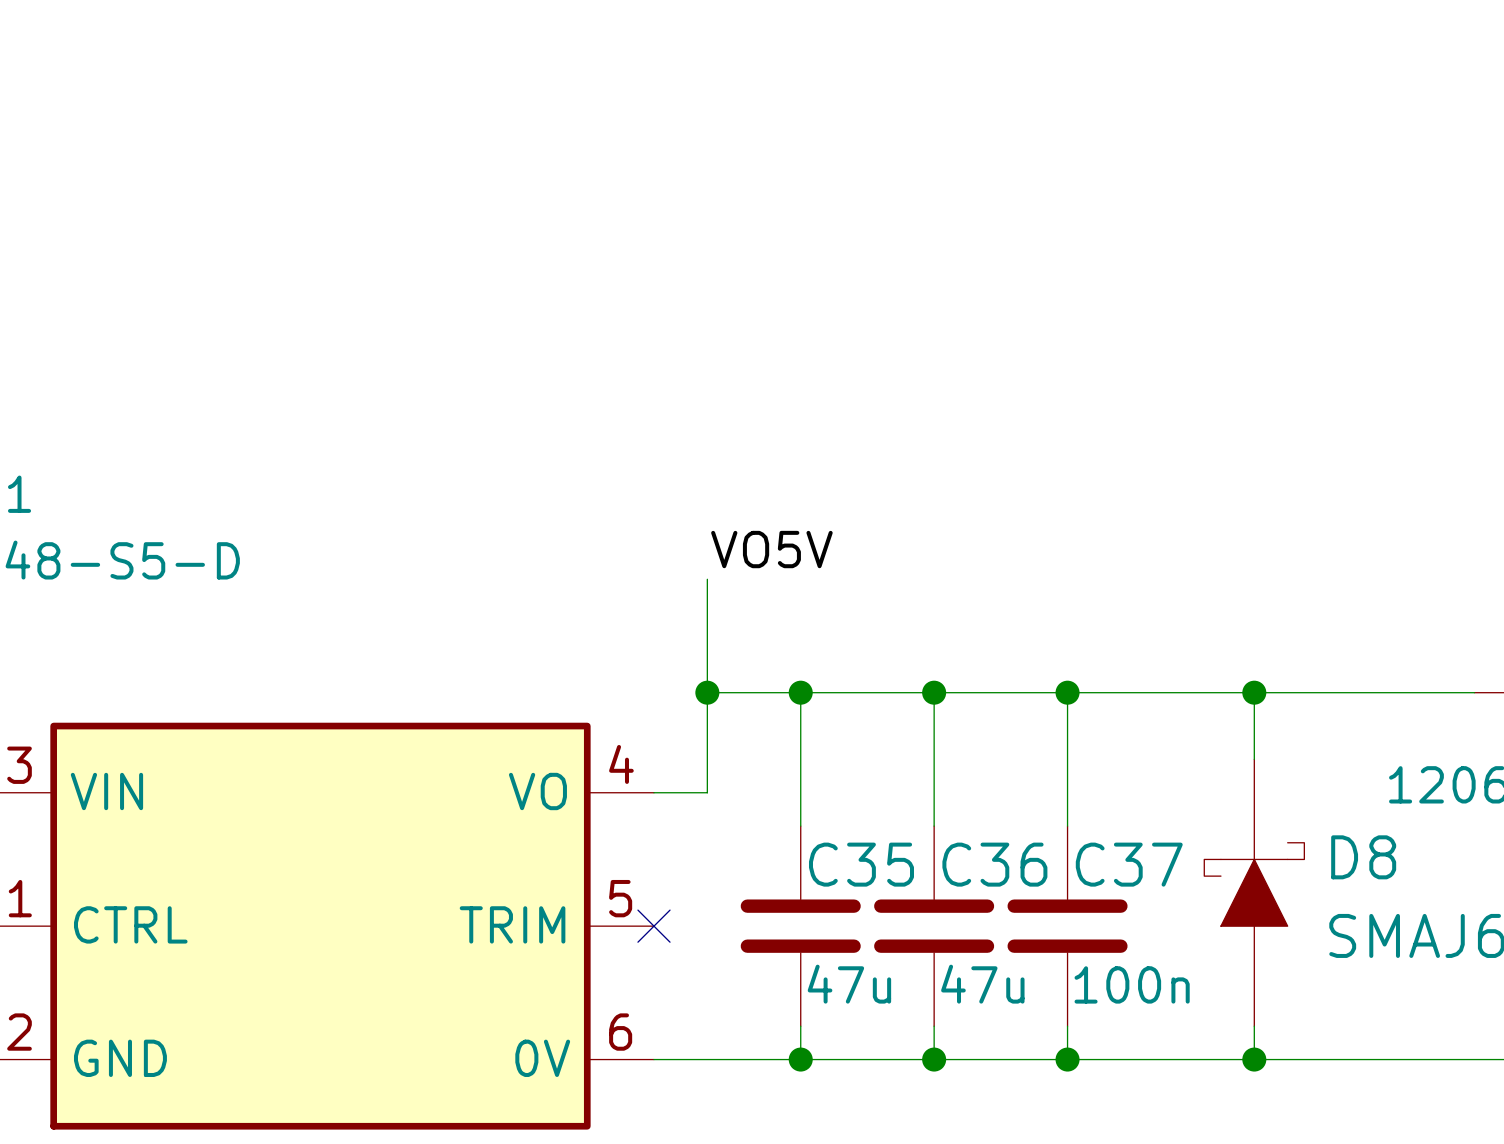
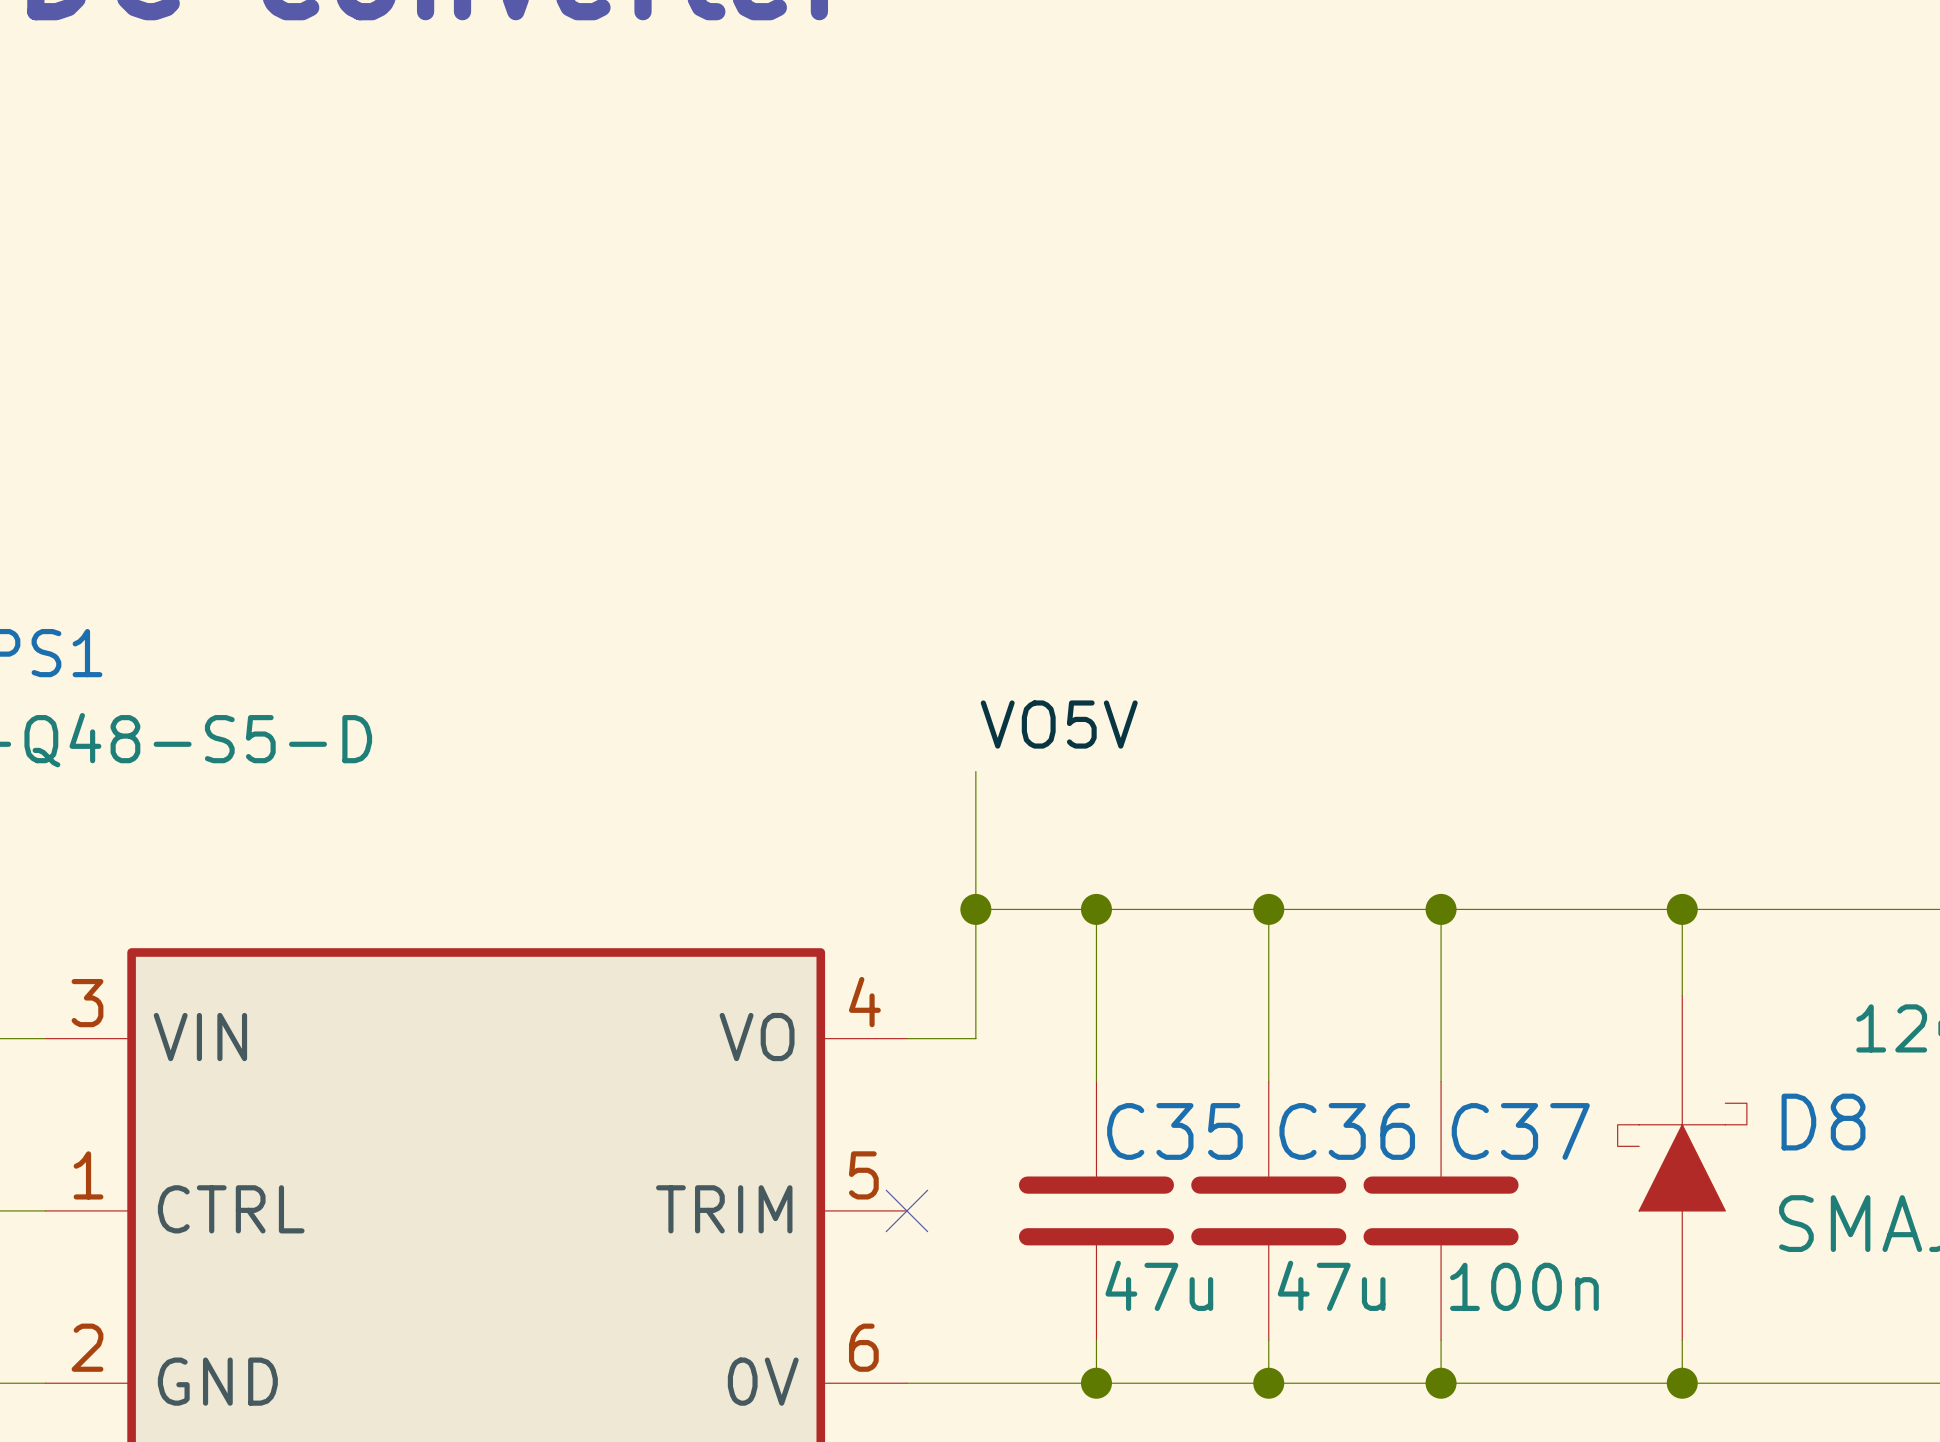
wire: (707, 579) (707, 585) -> none

